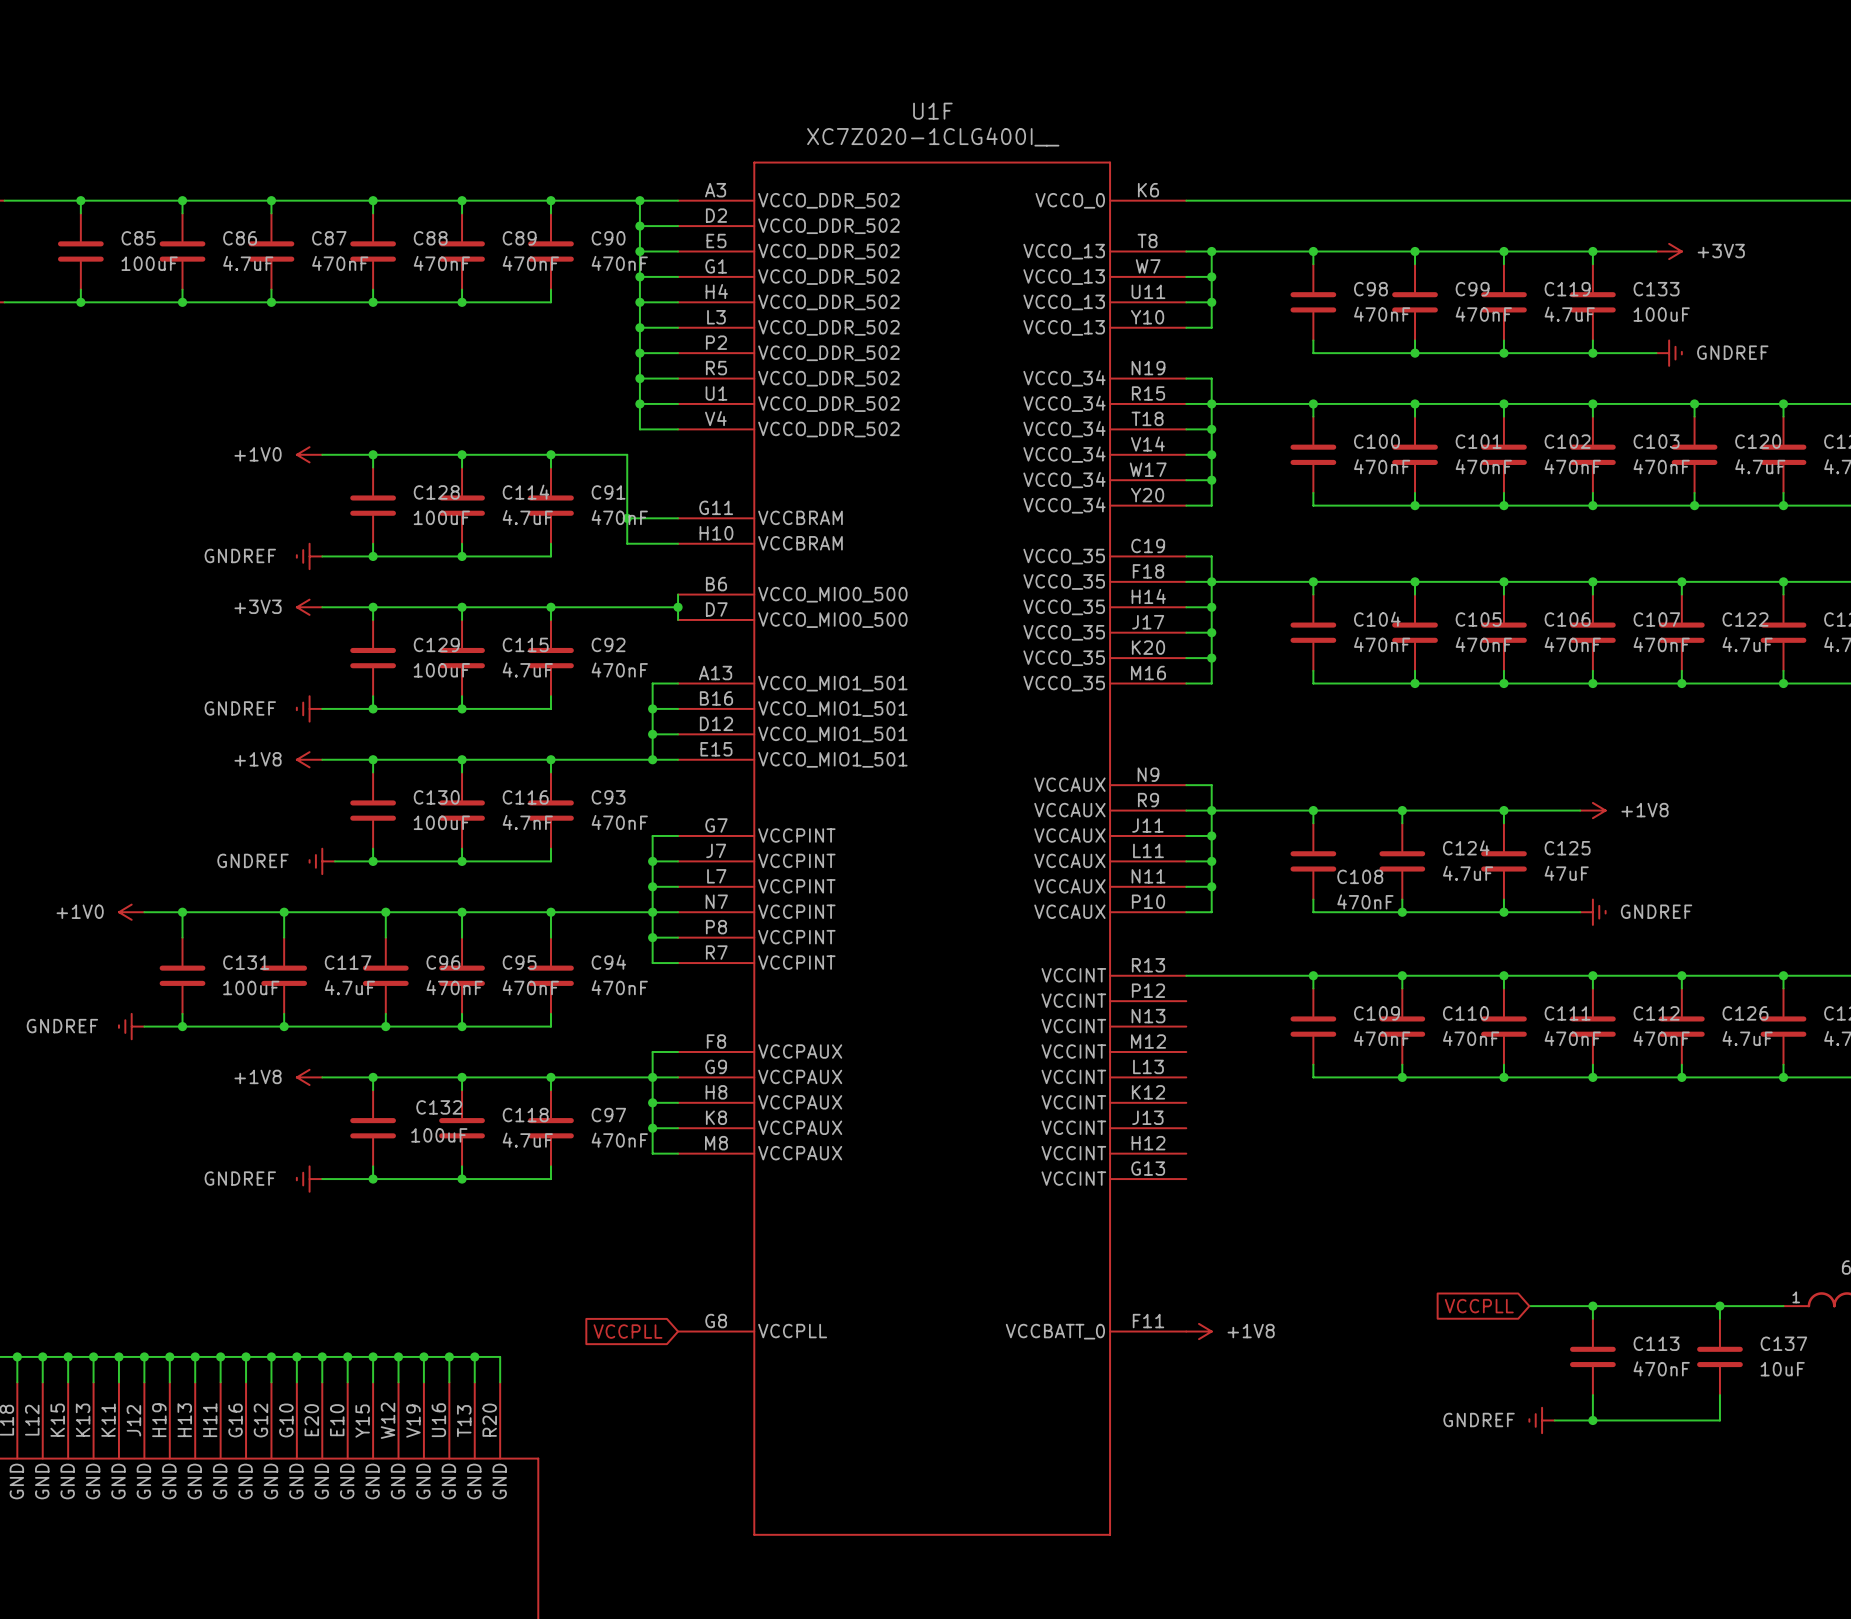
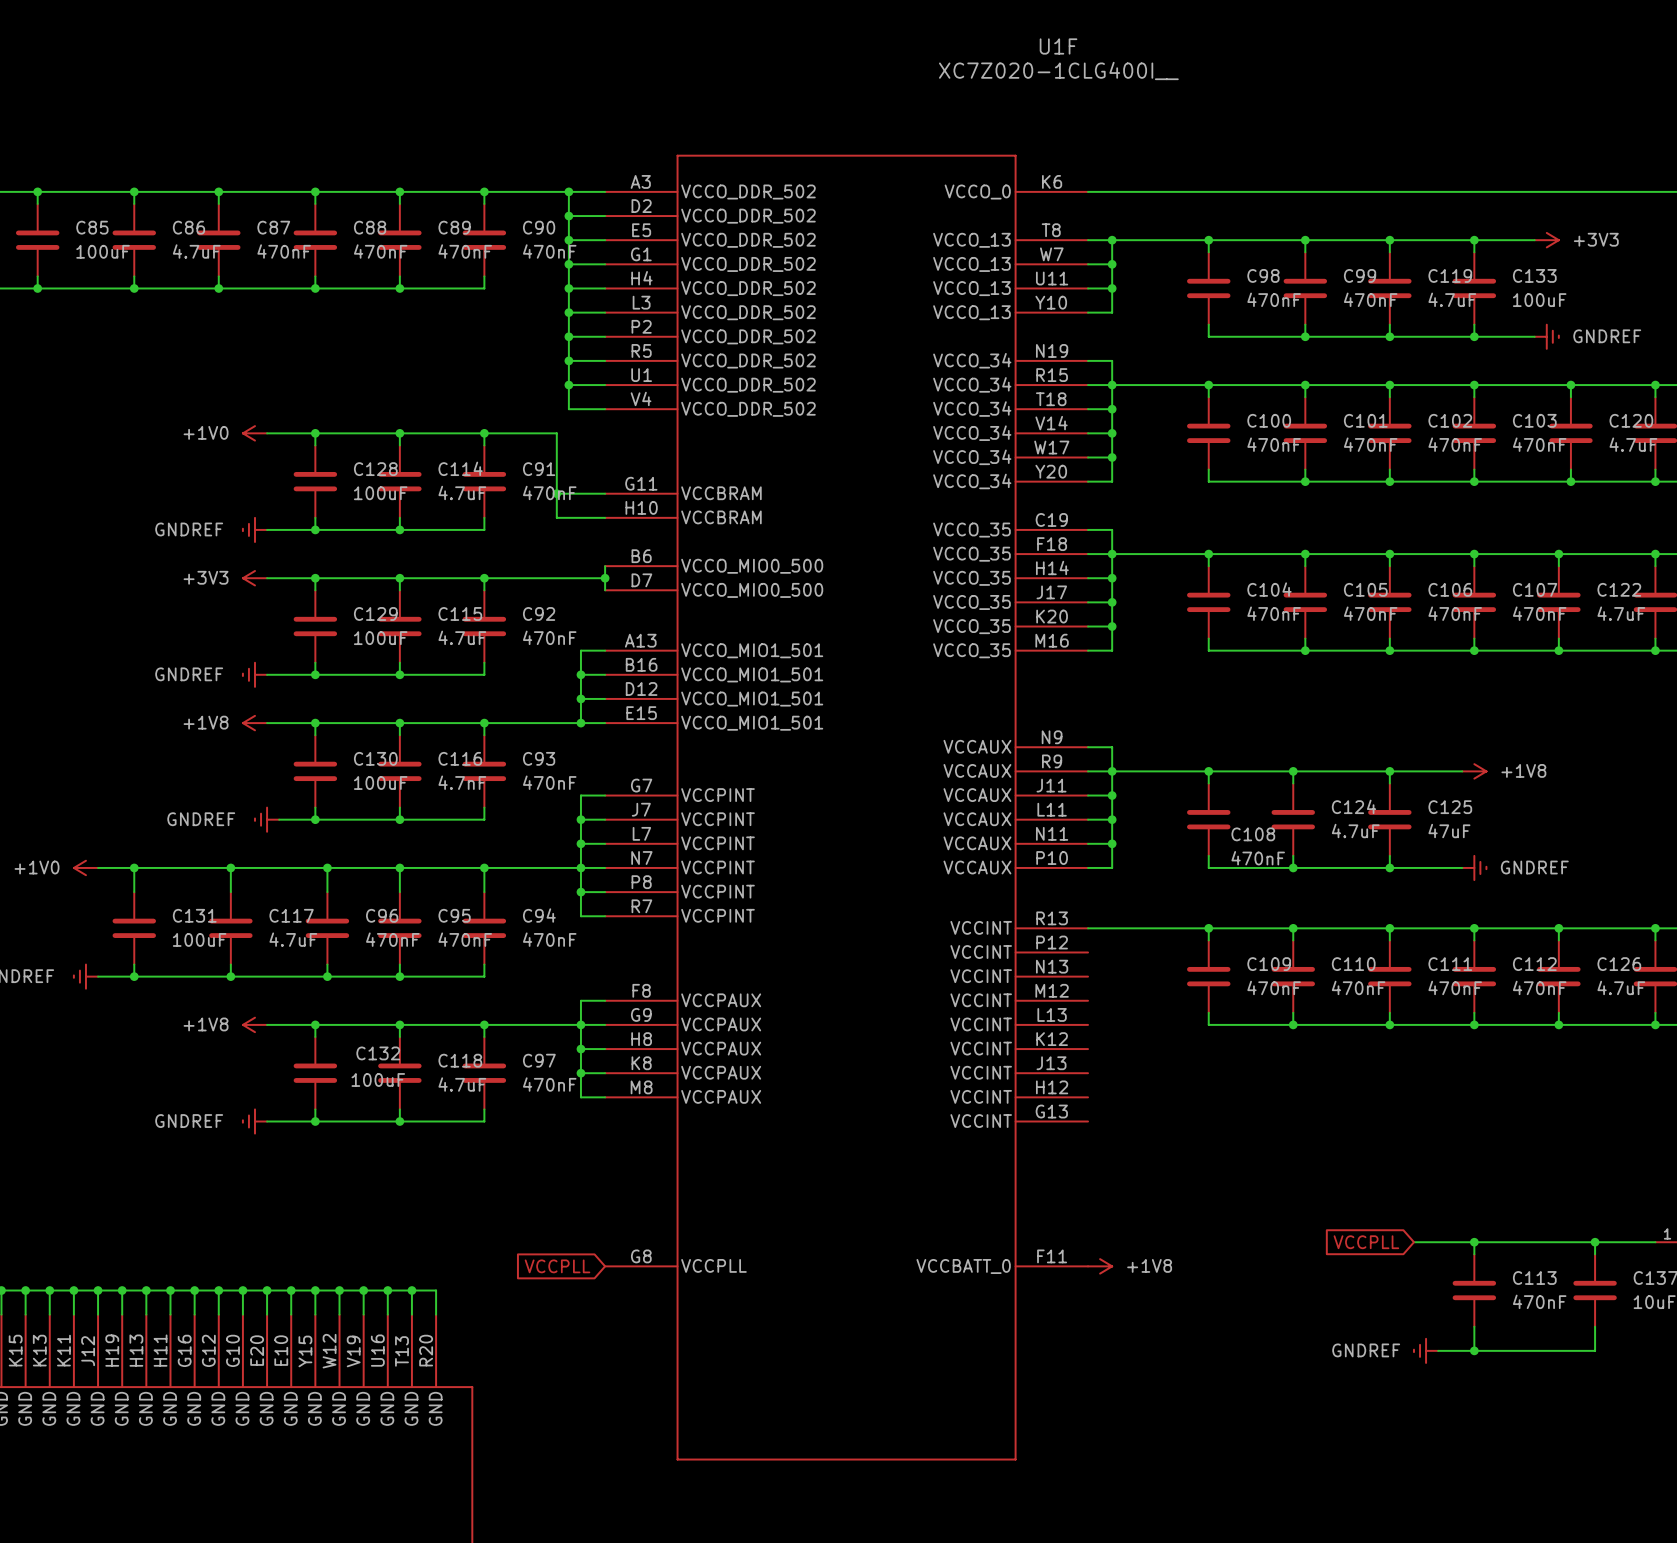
U1F name position: U1F (932, 111) -> U1F (1058, 46)
U1F value position: XC7Z020-1CLG400I__ (933, 136) -> XC7Z020-1CLG400I__ (1058, 70)

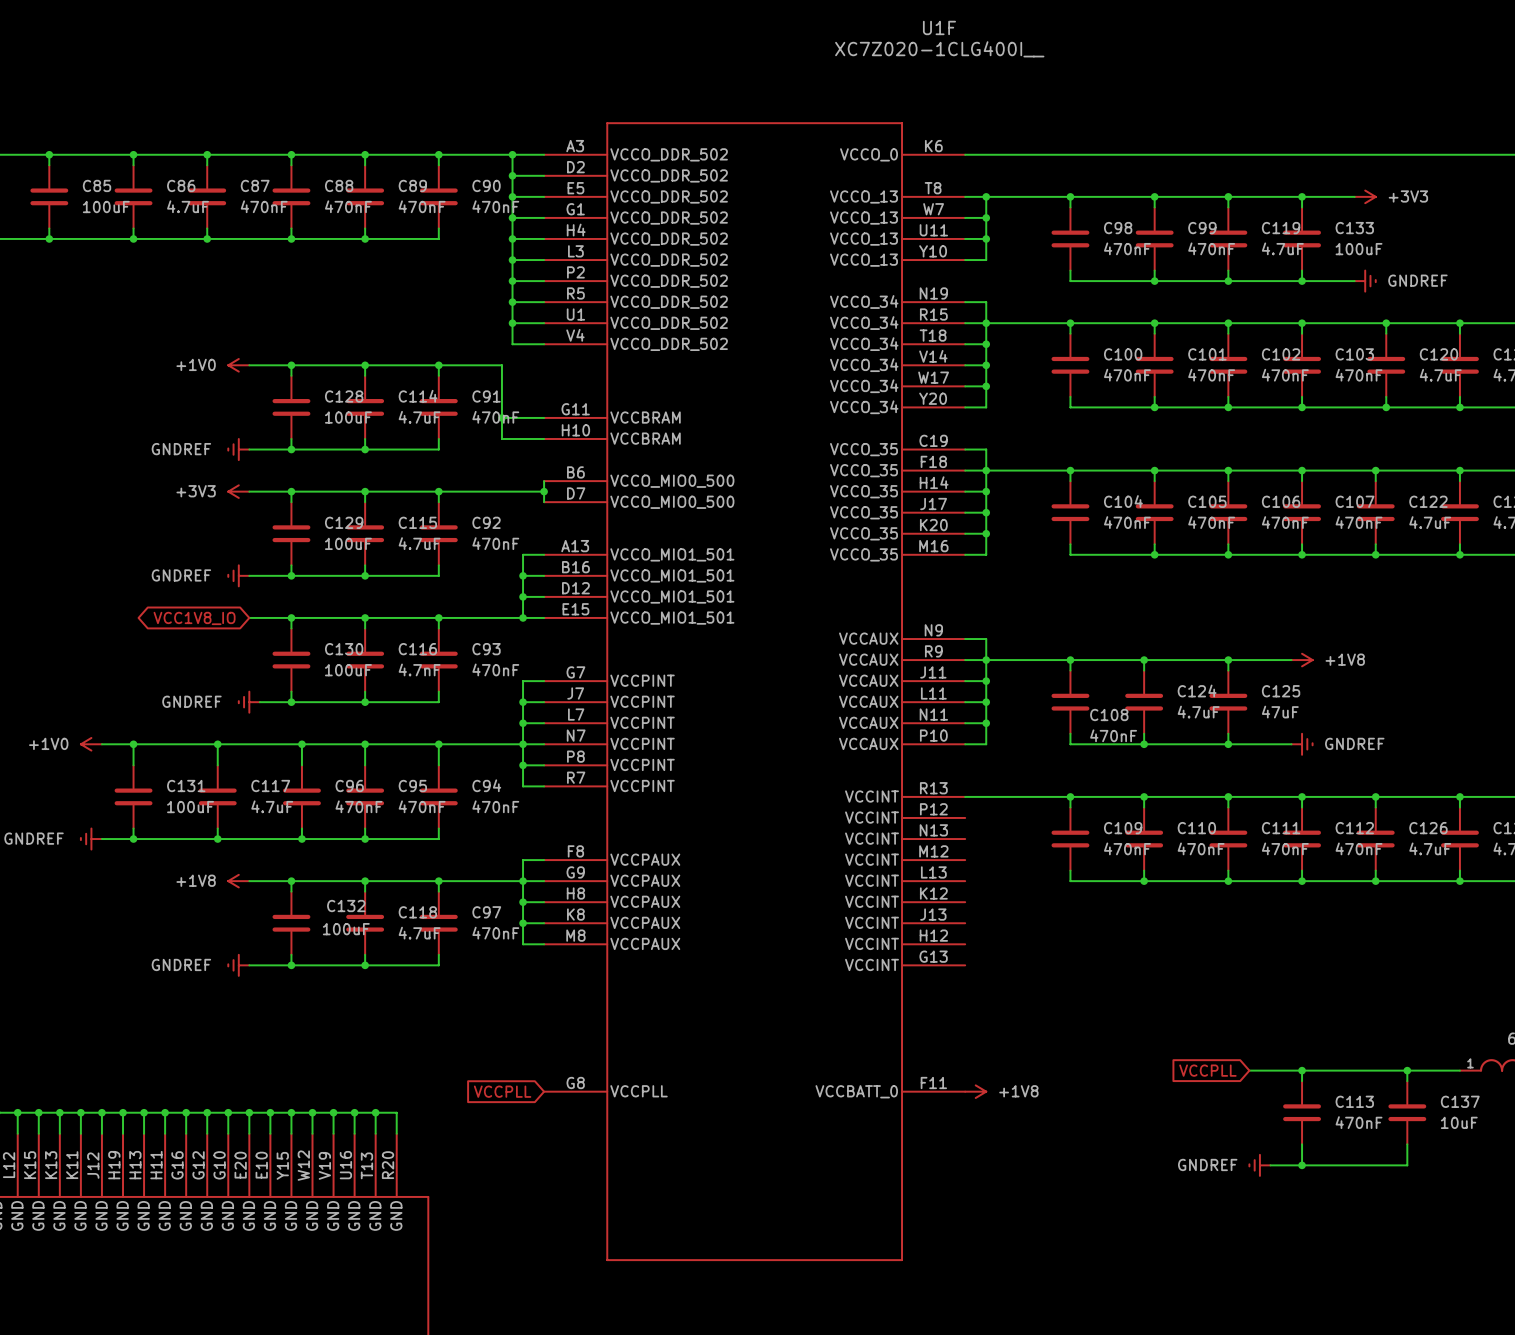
global label: none -> VCC1V8_IO (194, 618)
power symbol: +1V8 (255, 723) -> none

